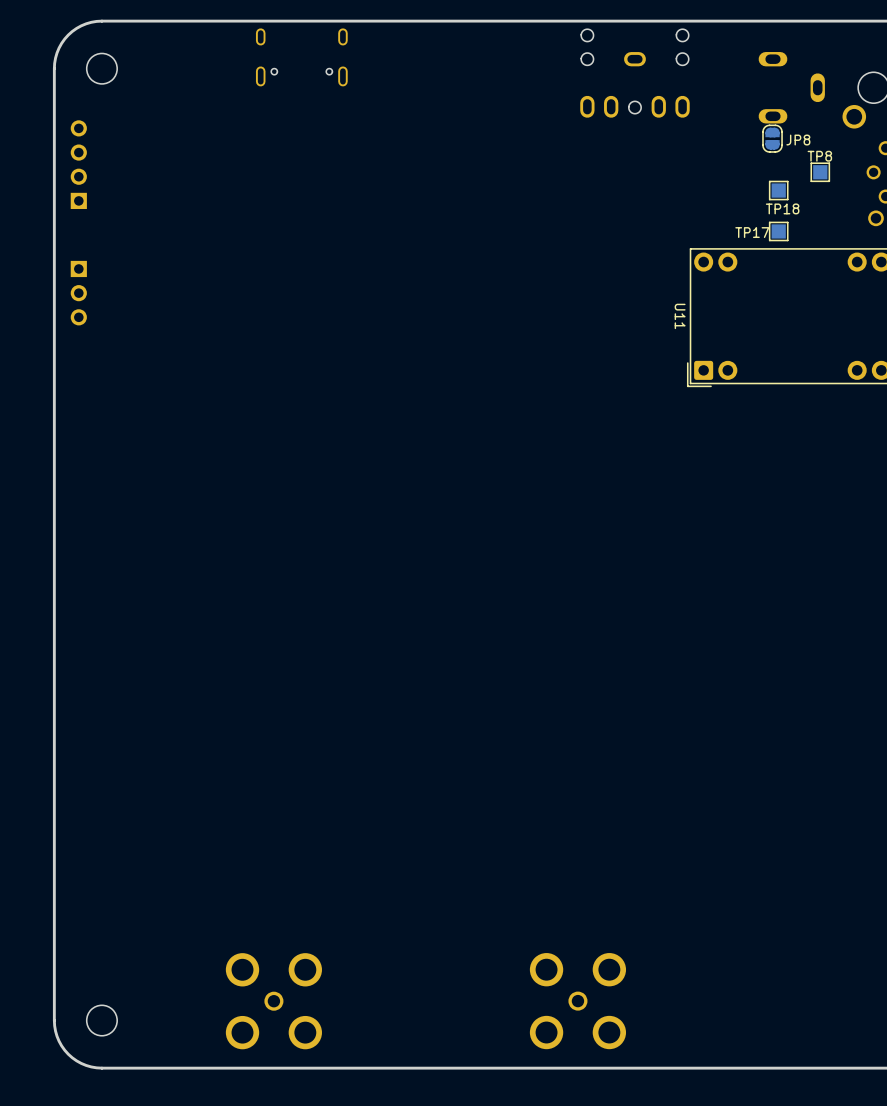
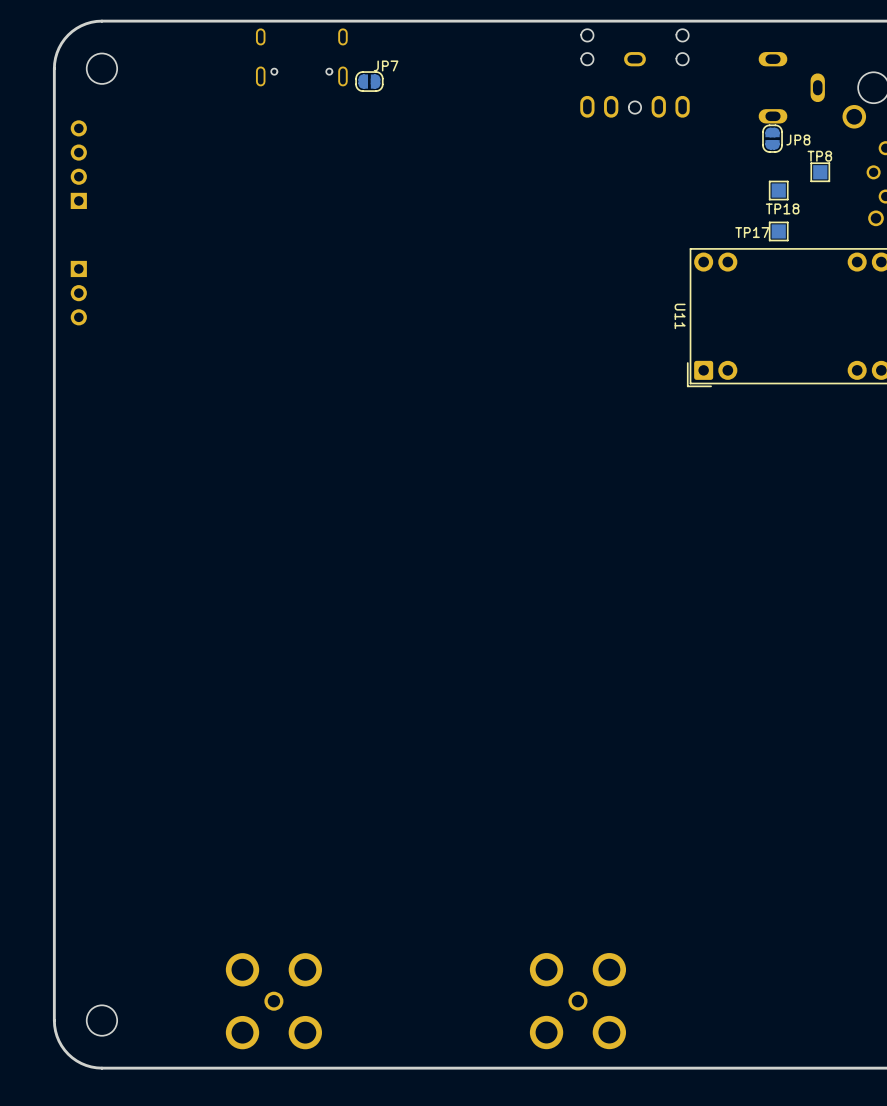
JP7: none -> (369, 81)

